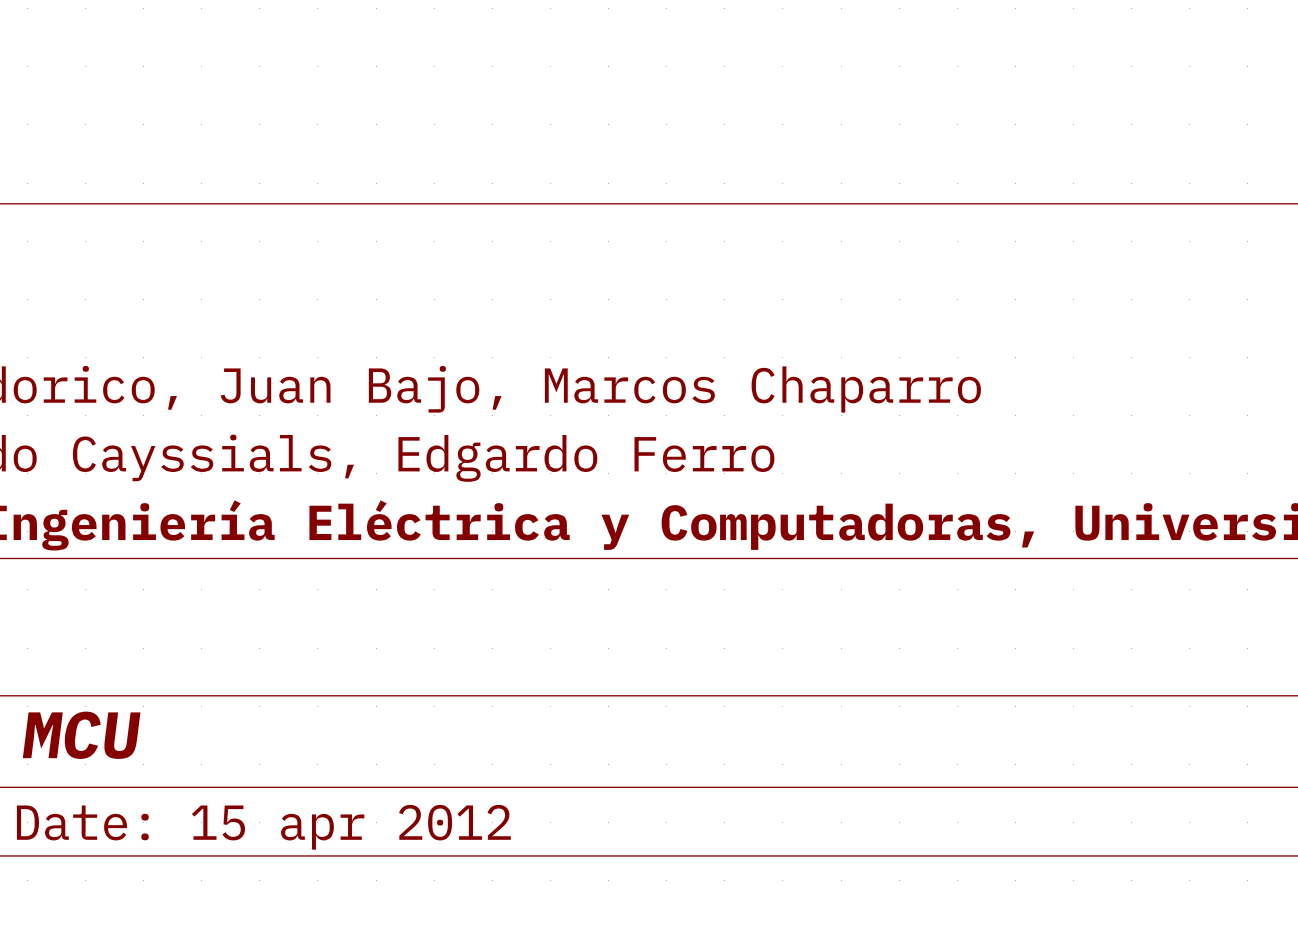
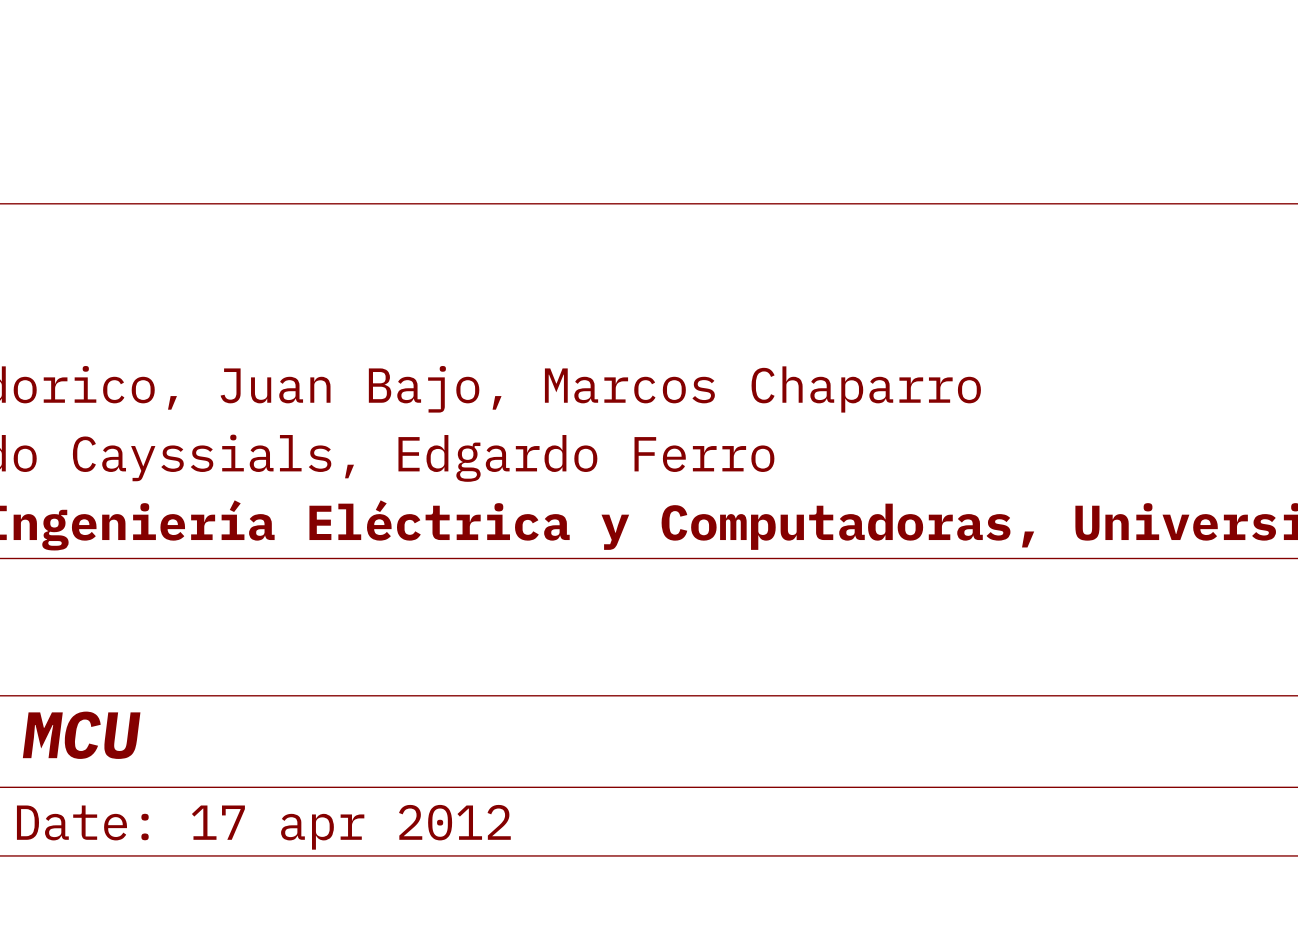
title block: Date: 15 apr 2012 (263, 827) -> Date: 17 apr 2012 (263, 827)

